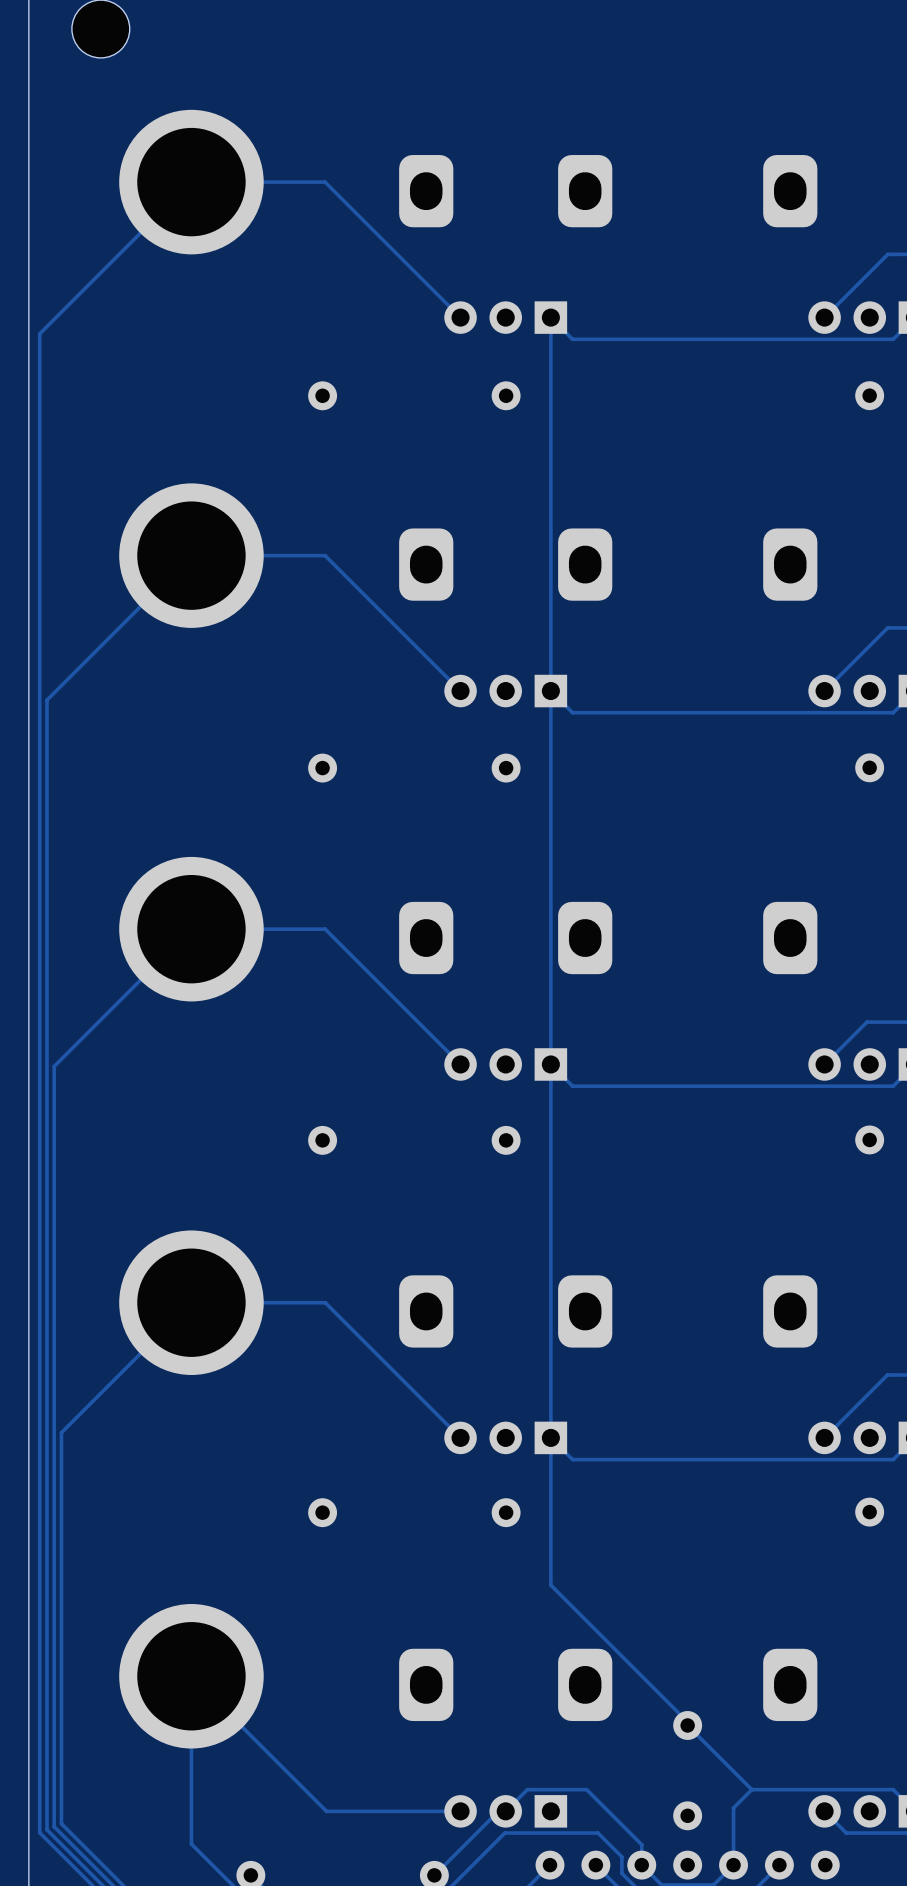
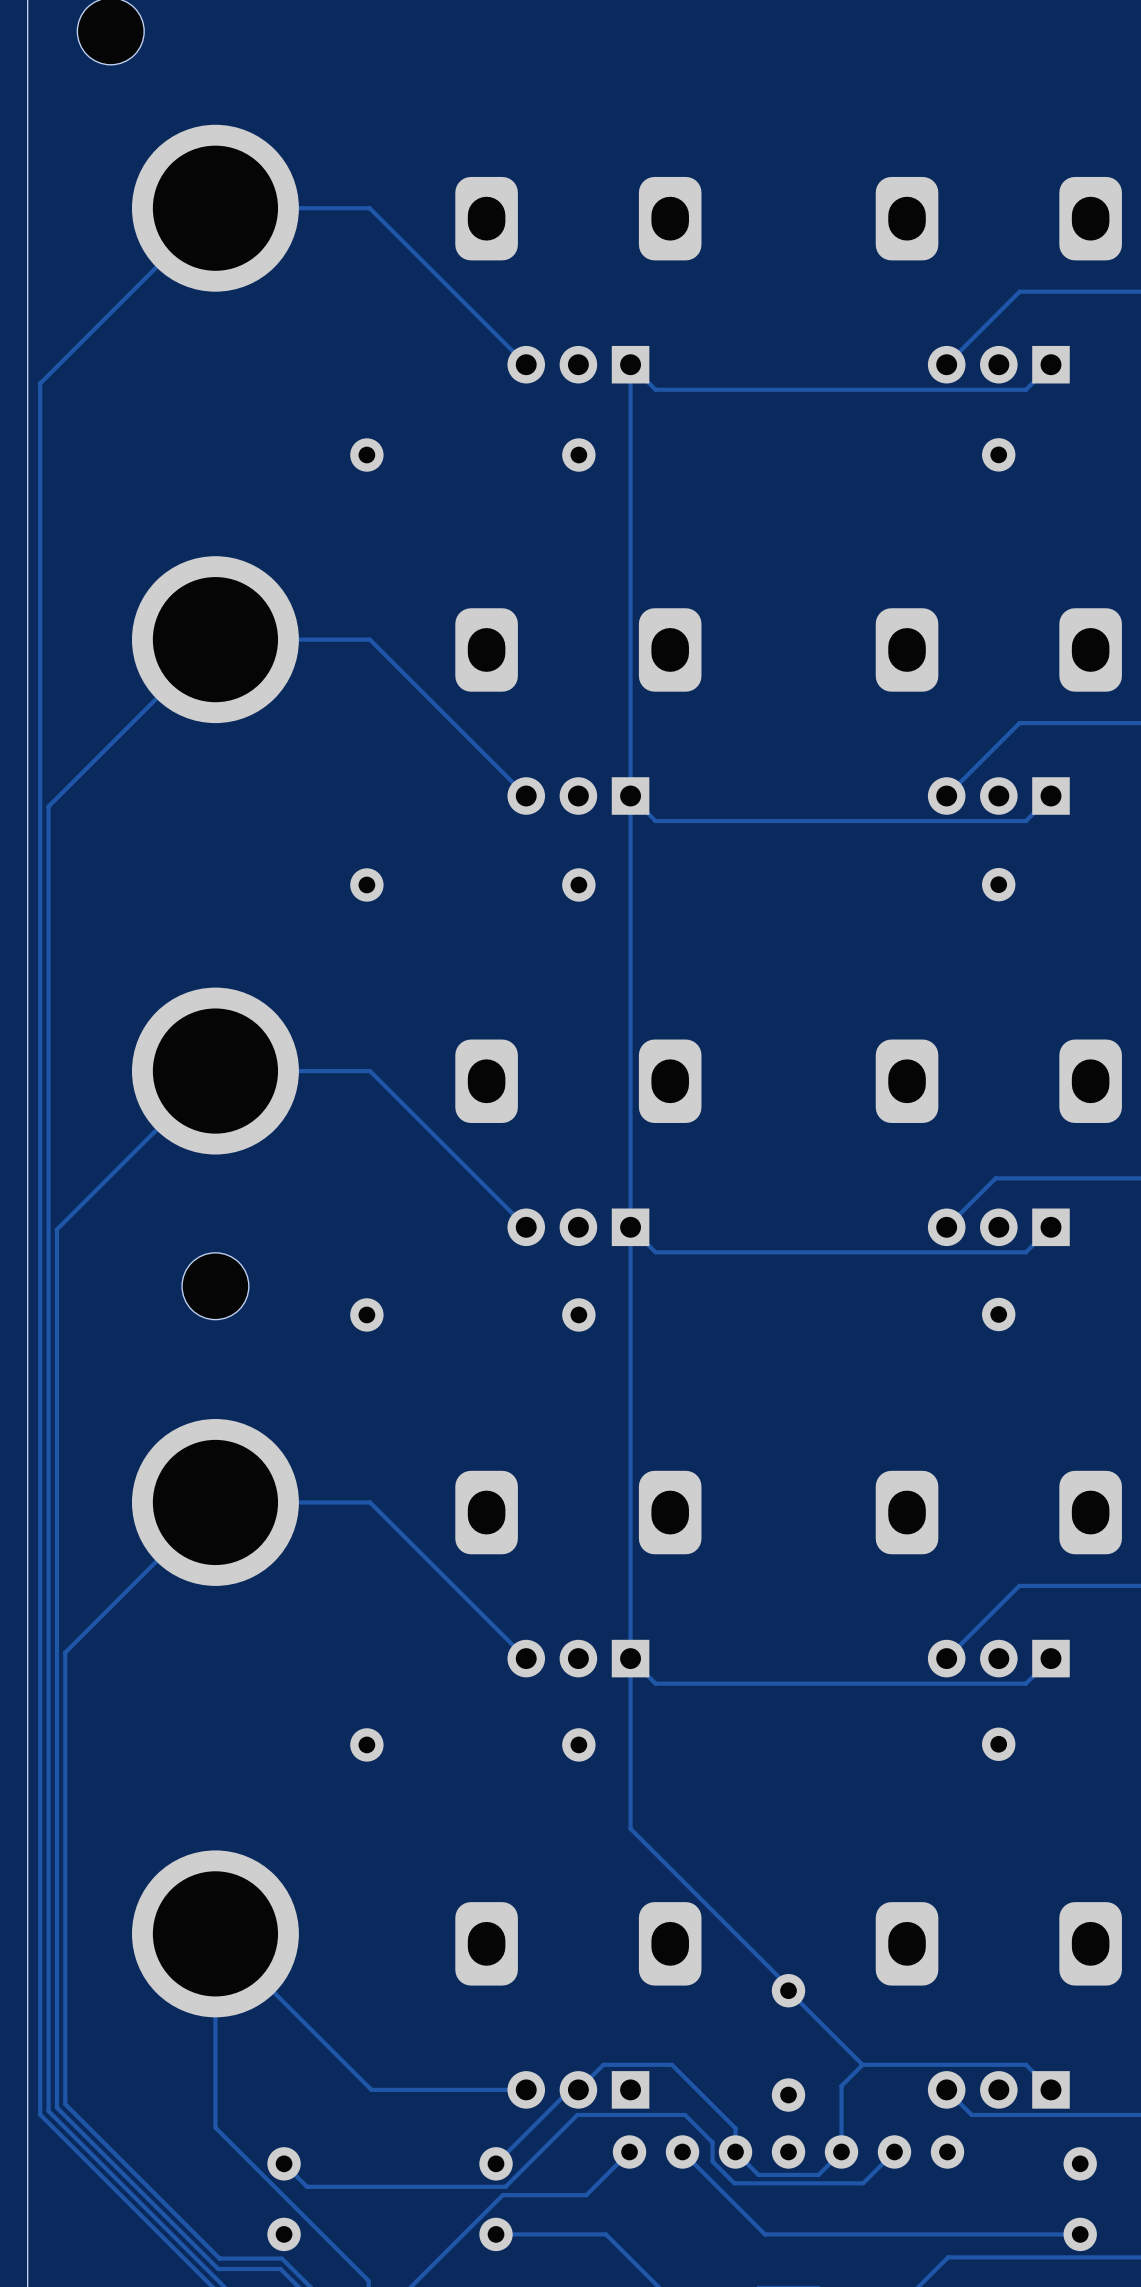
part: none -> (215, 1286)

